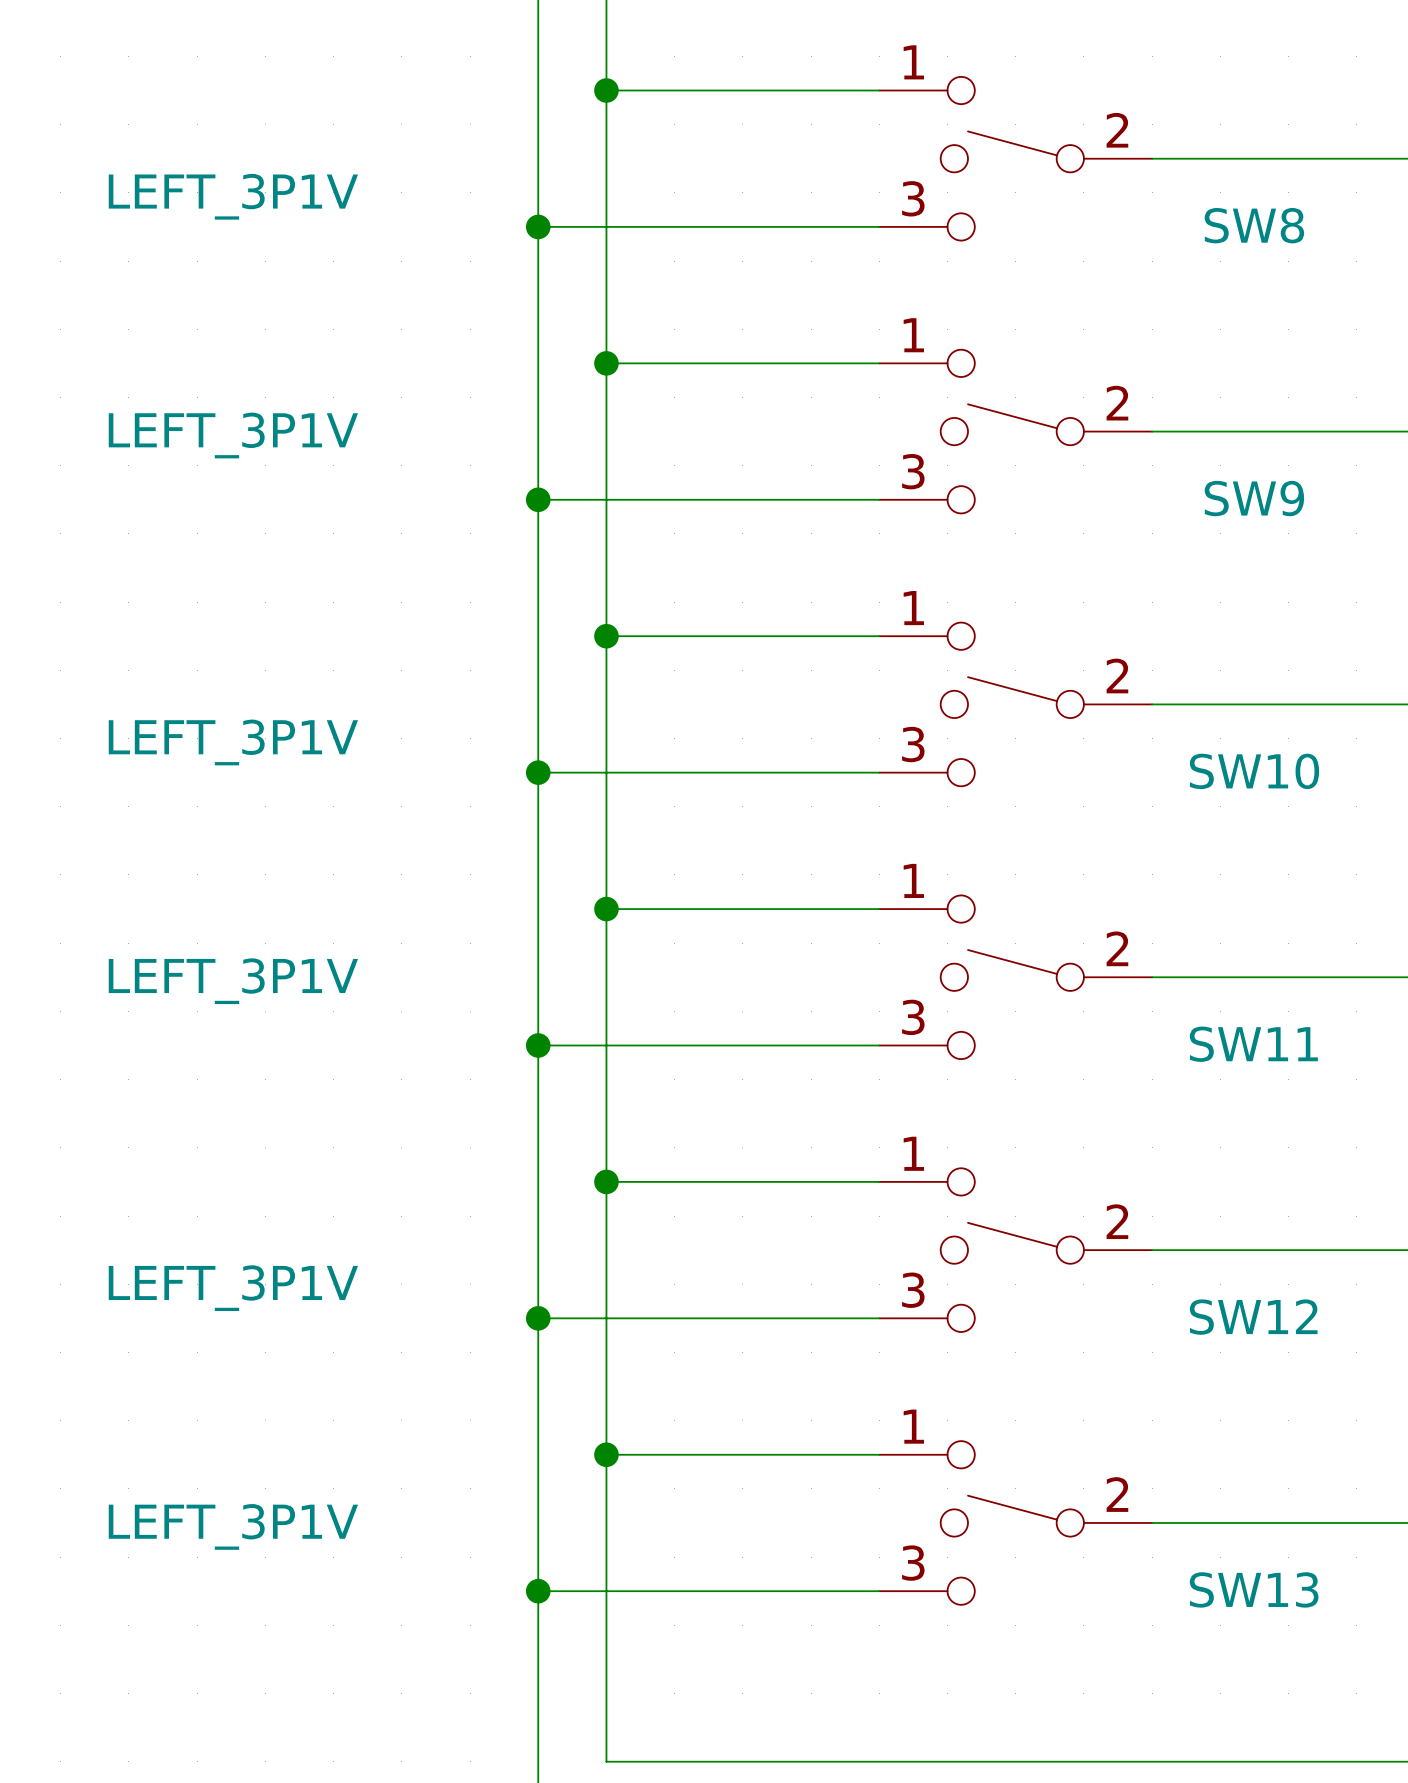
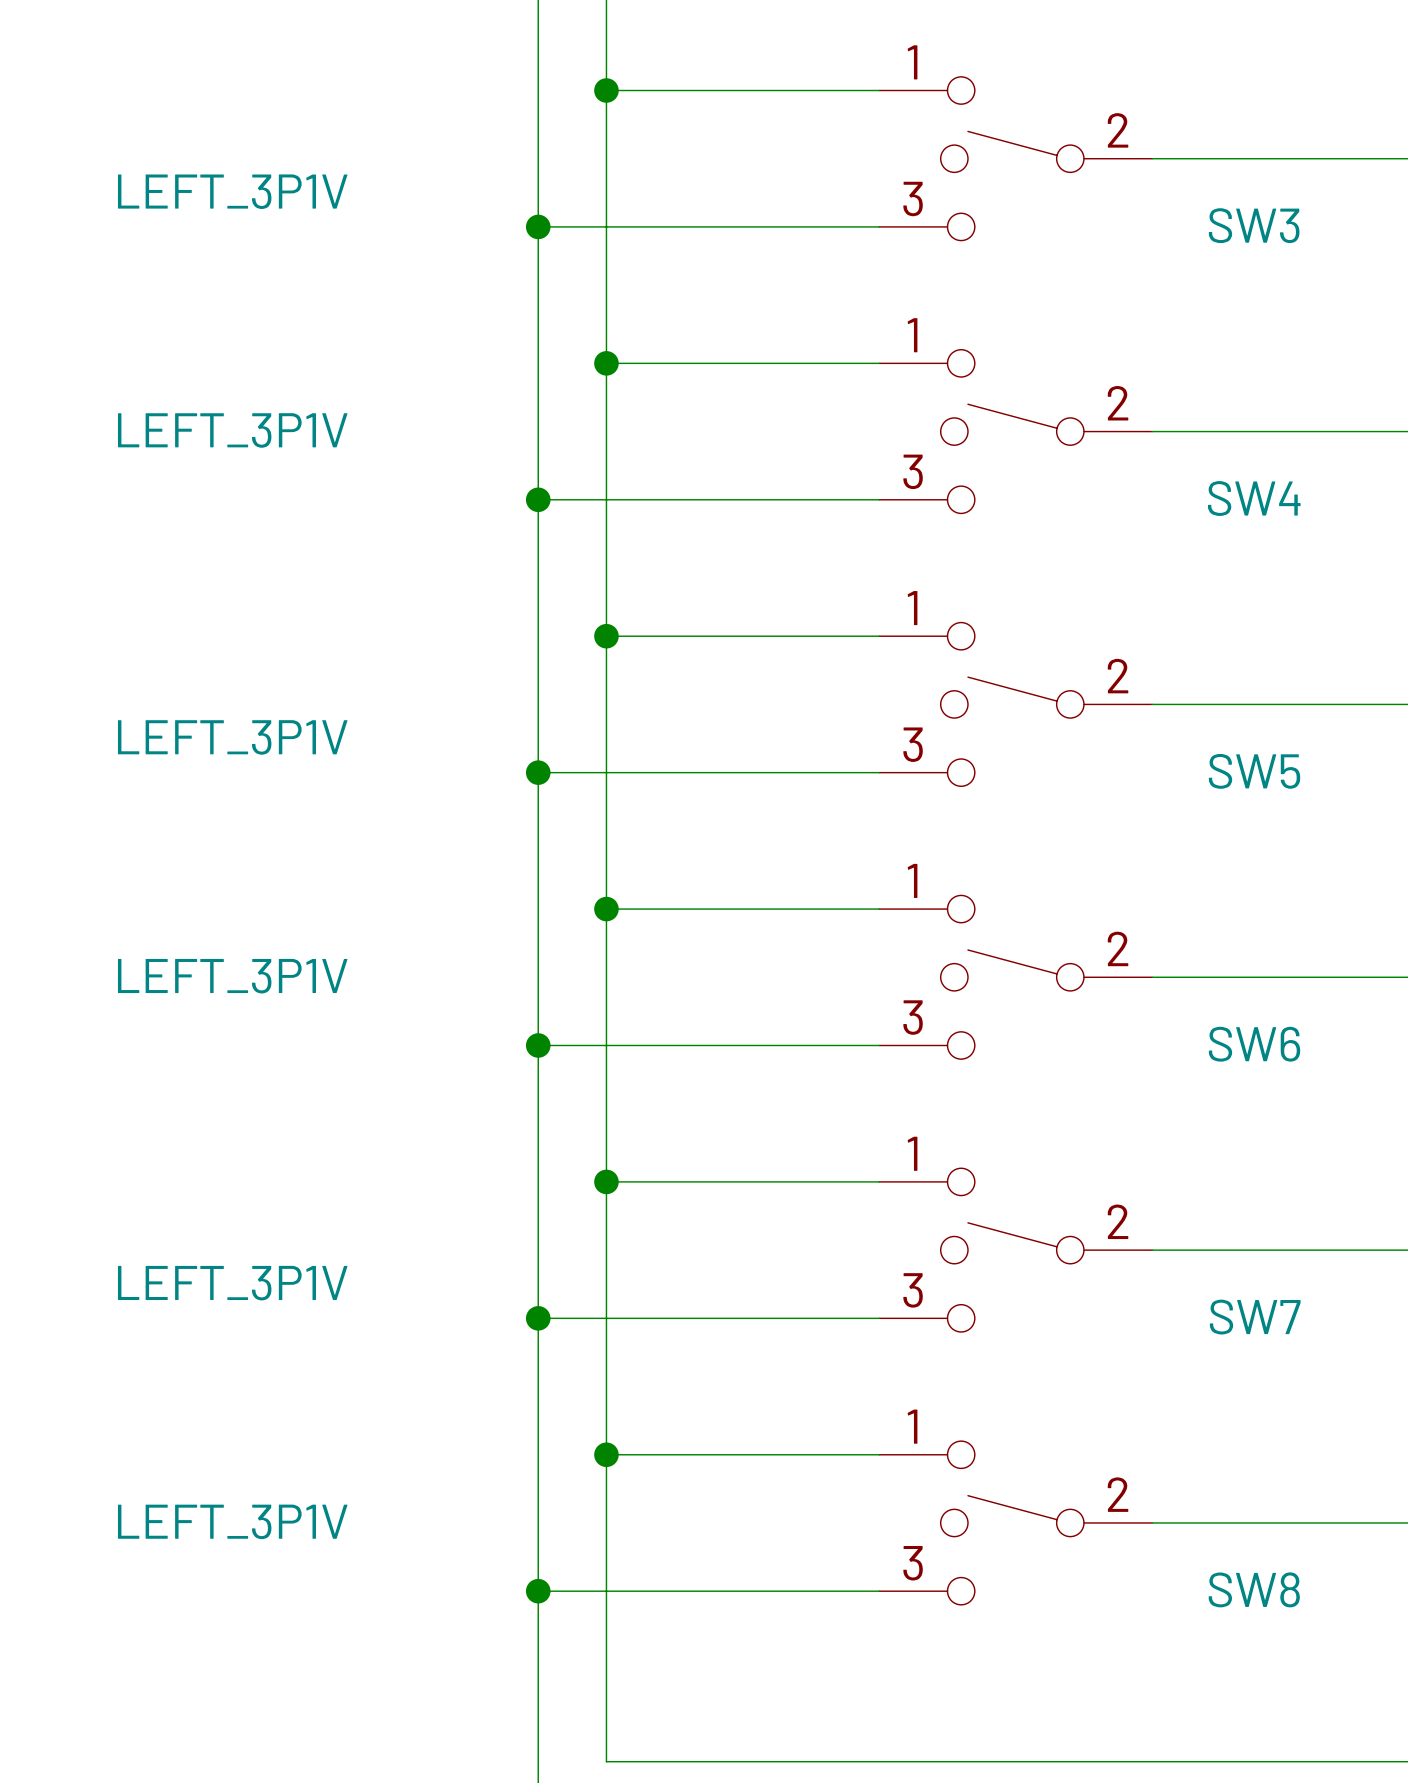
SW8 name: SW8 (1254, 225) -> SW3 (1254, 225)
SW9 name: SW9 (1254, 498) -> SW4 (1254, 498)
SW10 name: SW10 (1254, 771) -> SW5 (1254, 771)
SW11 name: SW11 (1253, 1044) -> SW6 (1254, 1044)
SW12 name: SW12 (1253, 1317) -> SW7 (1255, 1317)
SW13 name: SW13 (1254, 1589) -> SW8 (1254, 1589)

